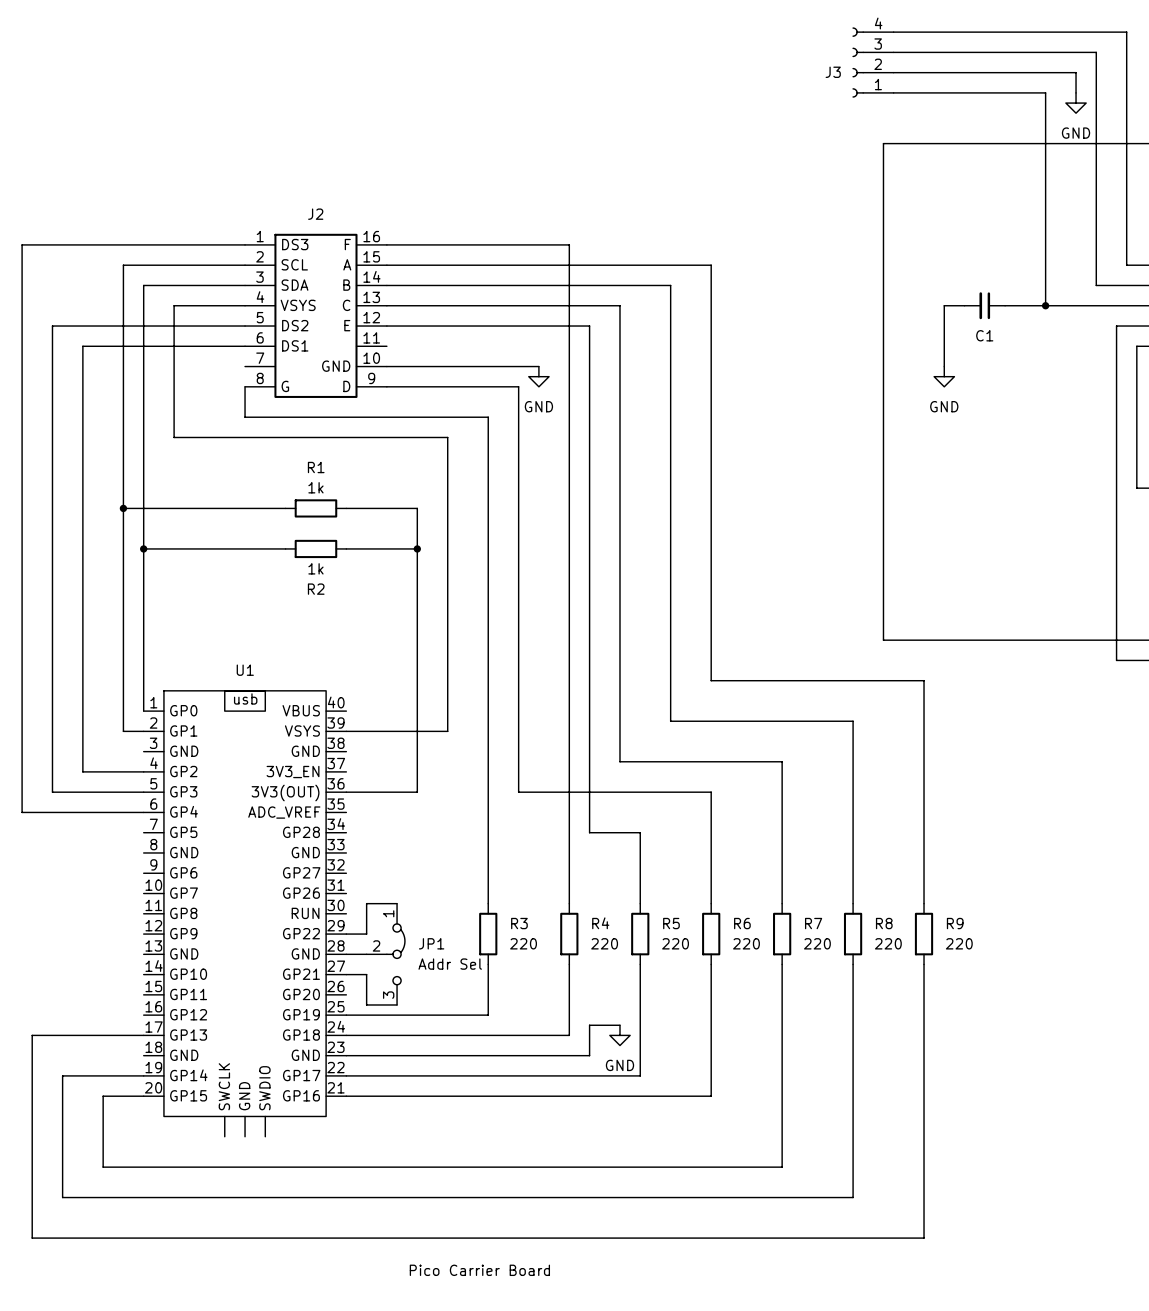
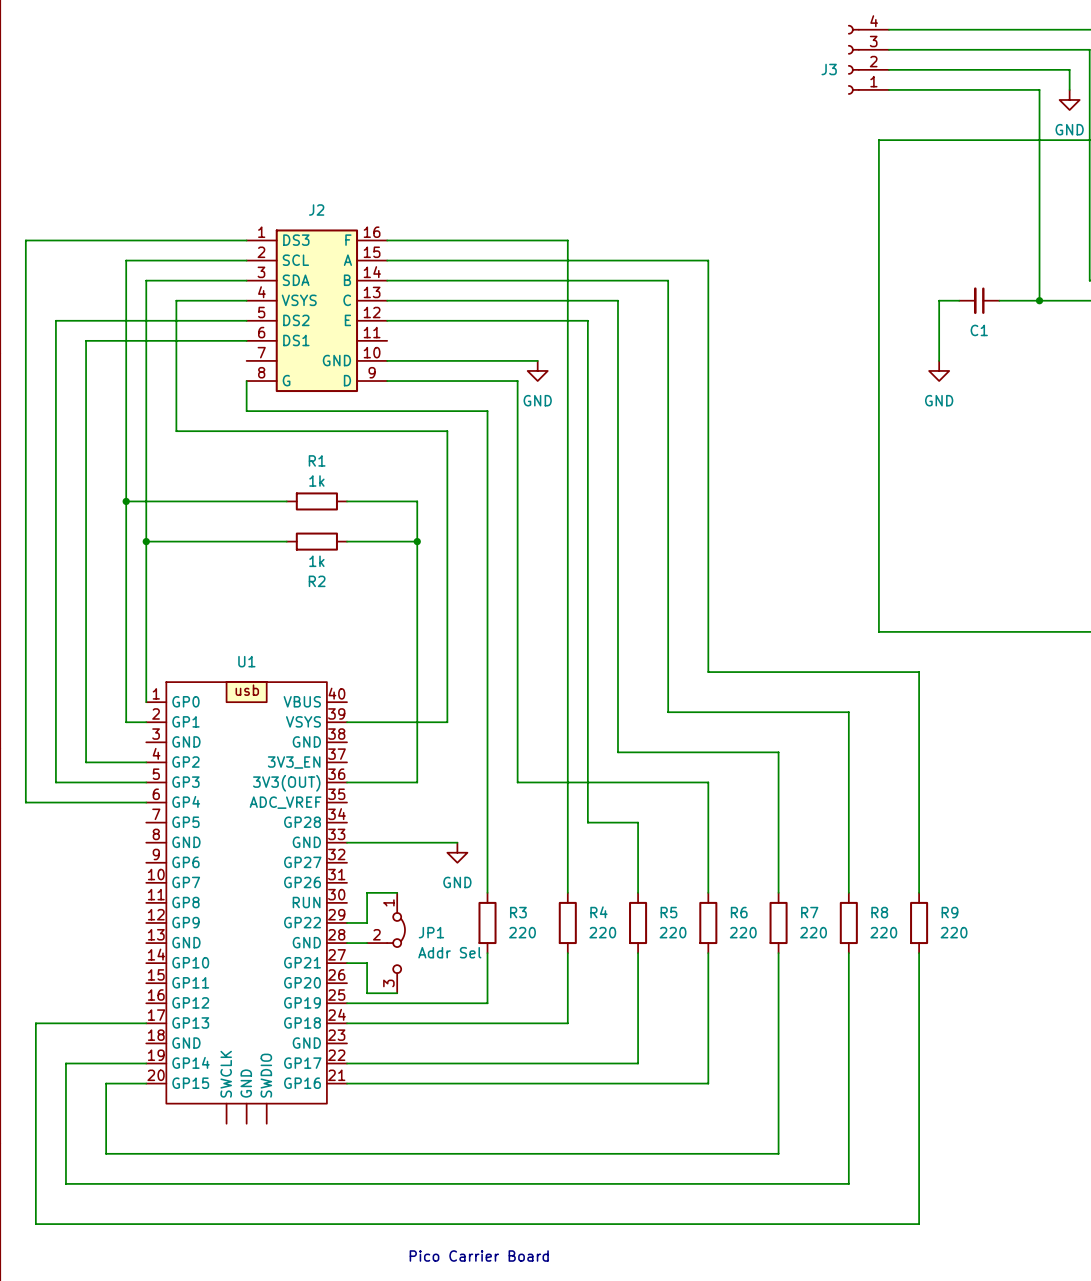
wire: none -> (347, 842) (457, 842)
power symbol: none -> GND (457, 852)
wire: (619, 1025) (589, 1025) (589, 1055) (346, 1055) -> none
power symbol: GND (619, 1035) -> none

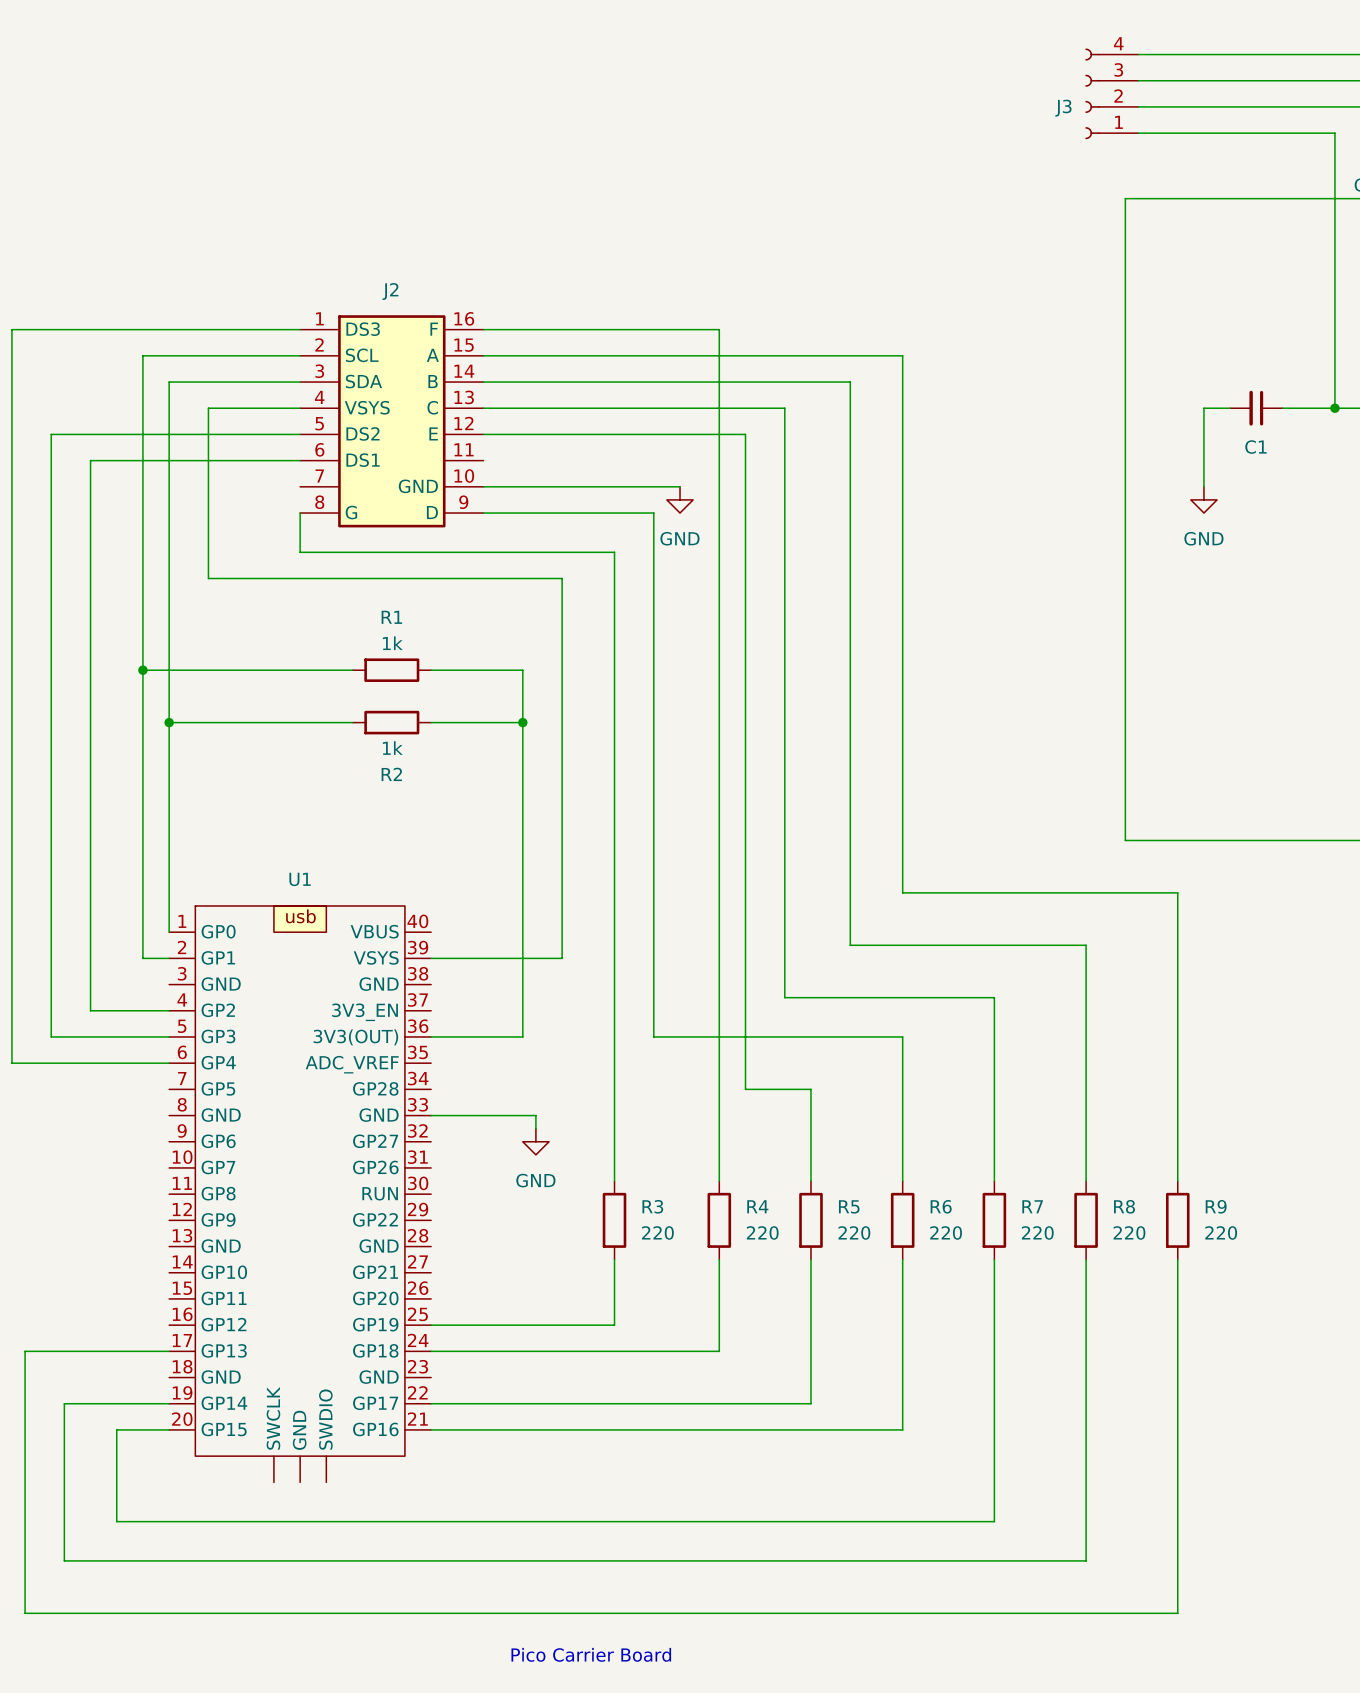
wire: (427, 842) (457, 842) -> (535, 1115) (535, 1128)
power symbol position: GND (457, 852) -> GND (535, 1141)
wire: (397, 892) (367, 892) (367, 922) (347, 922) -> none
wire: (347, 943) (367, 943) -> none
JP1: Addr Sel (386, 943) -> none
wire: (347, 963) (367, 963) (367, 993) (397, 993) -> none

